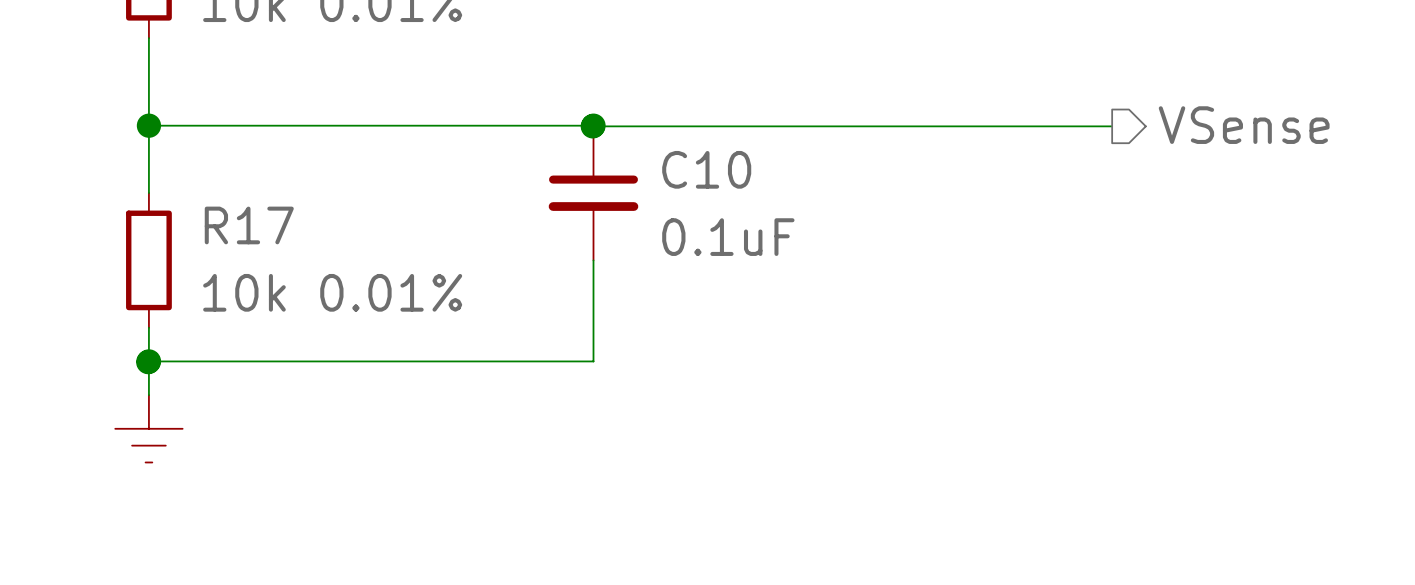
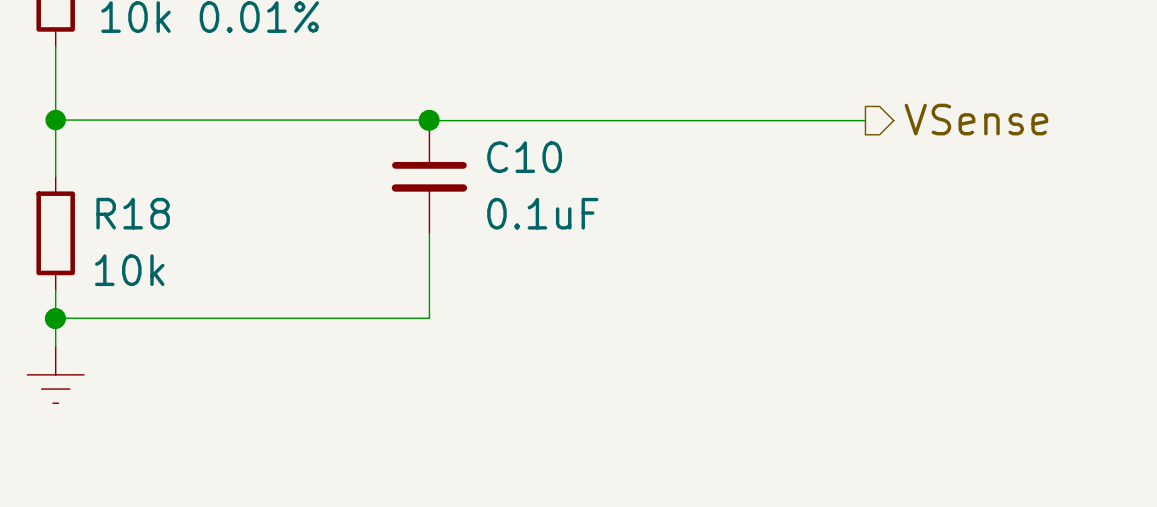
R17 name: R17 (249, 225) -> R18 (133, 213)
R17 value: 10k 0.01% (332, 292) -> 10k (129, 270)

